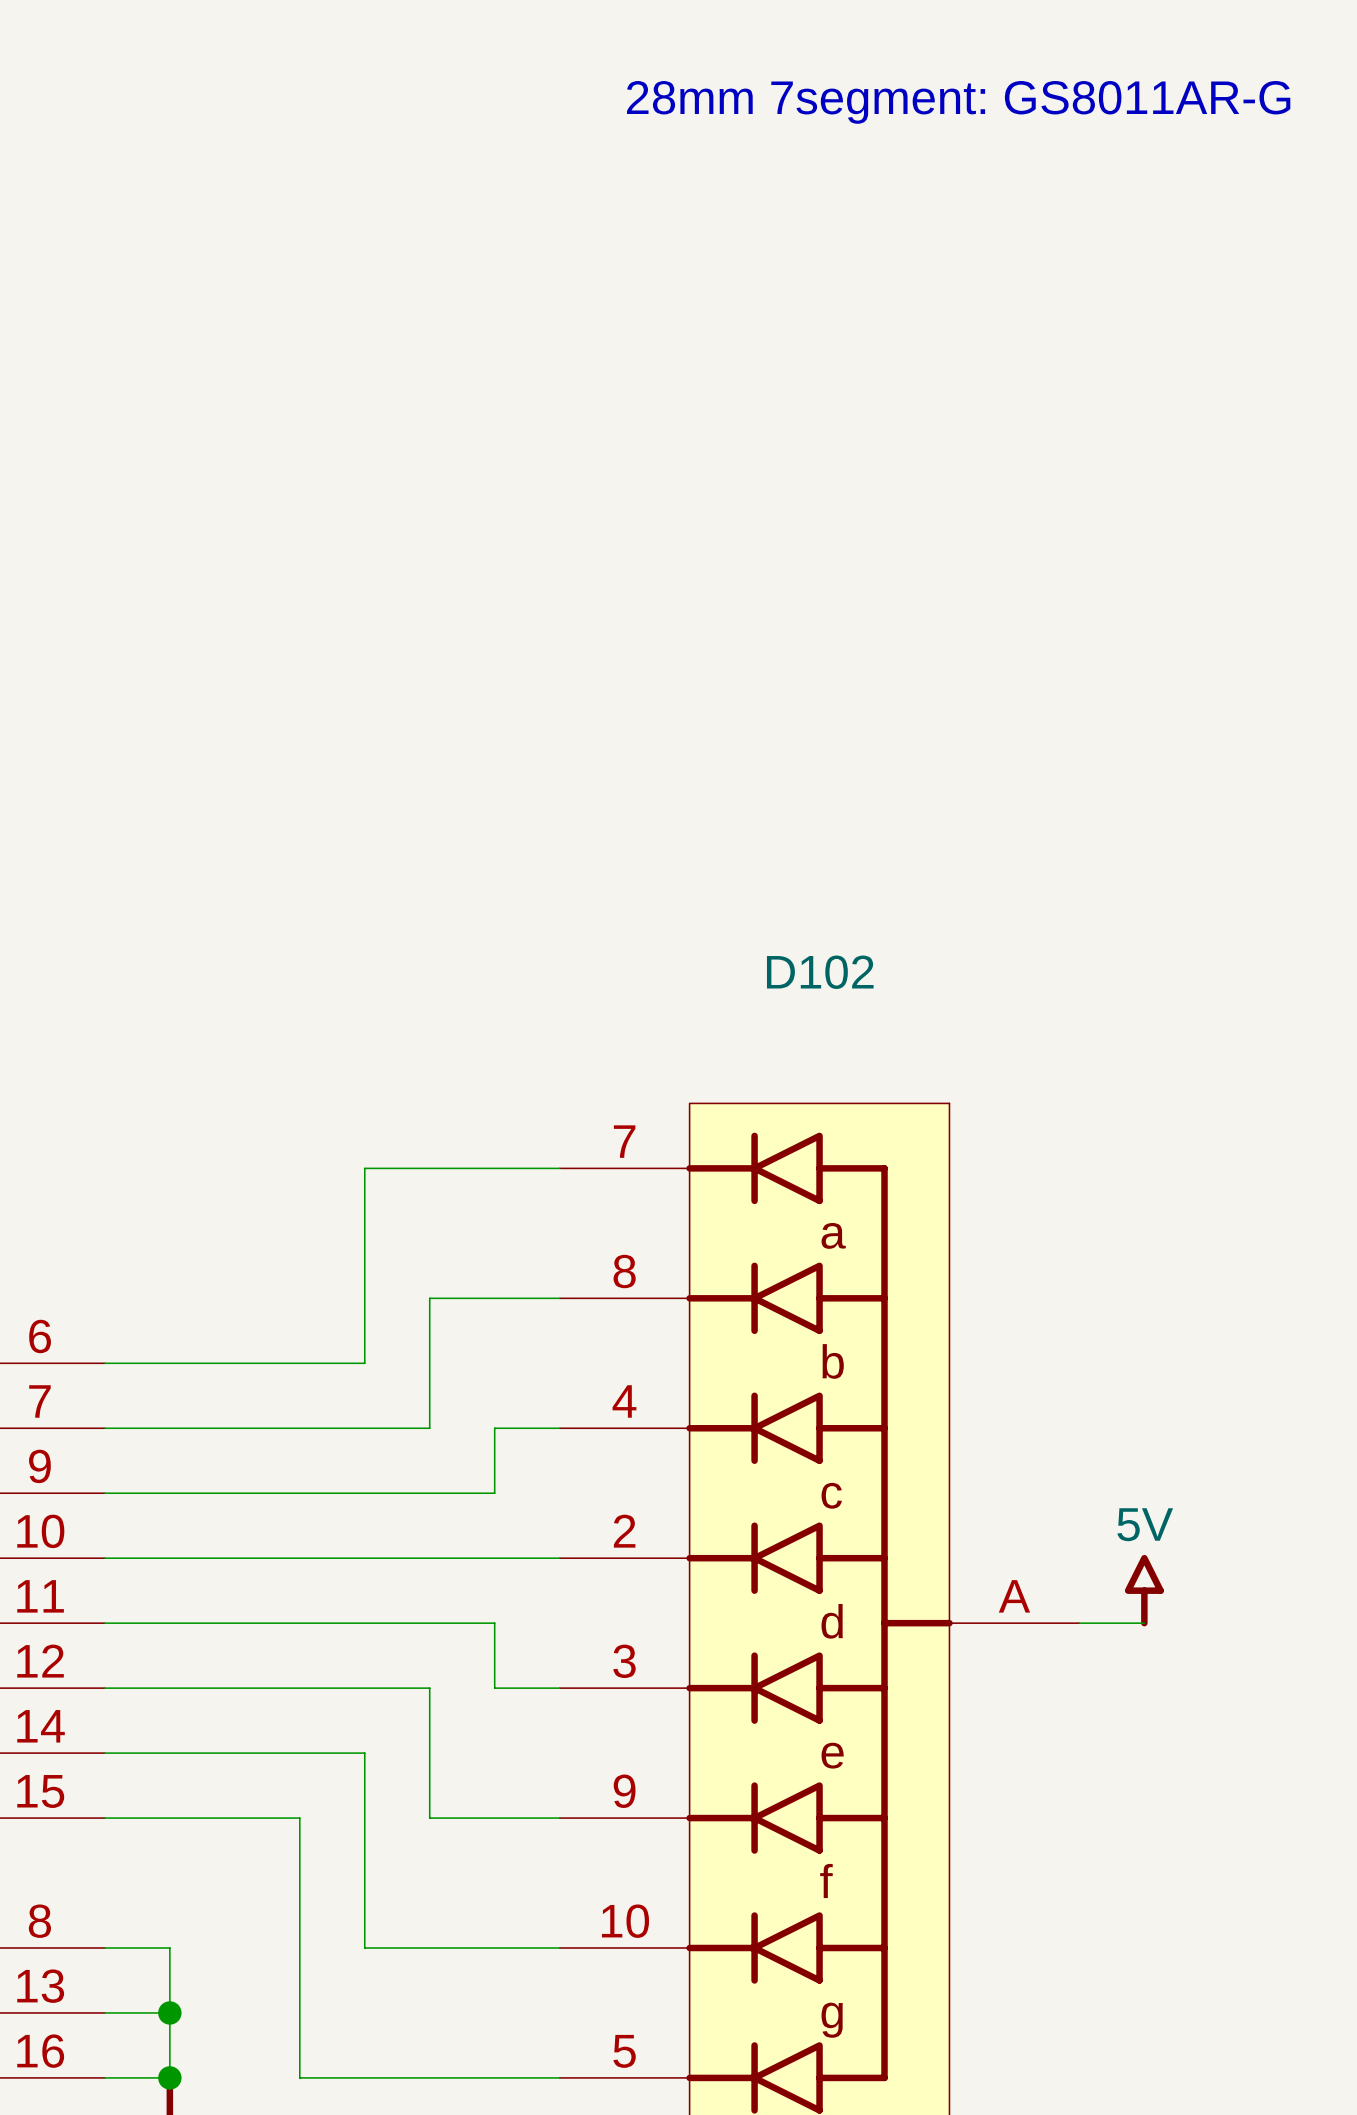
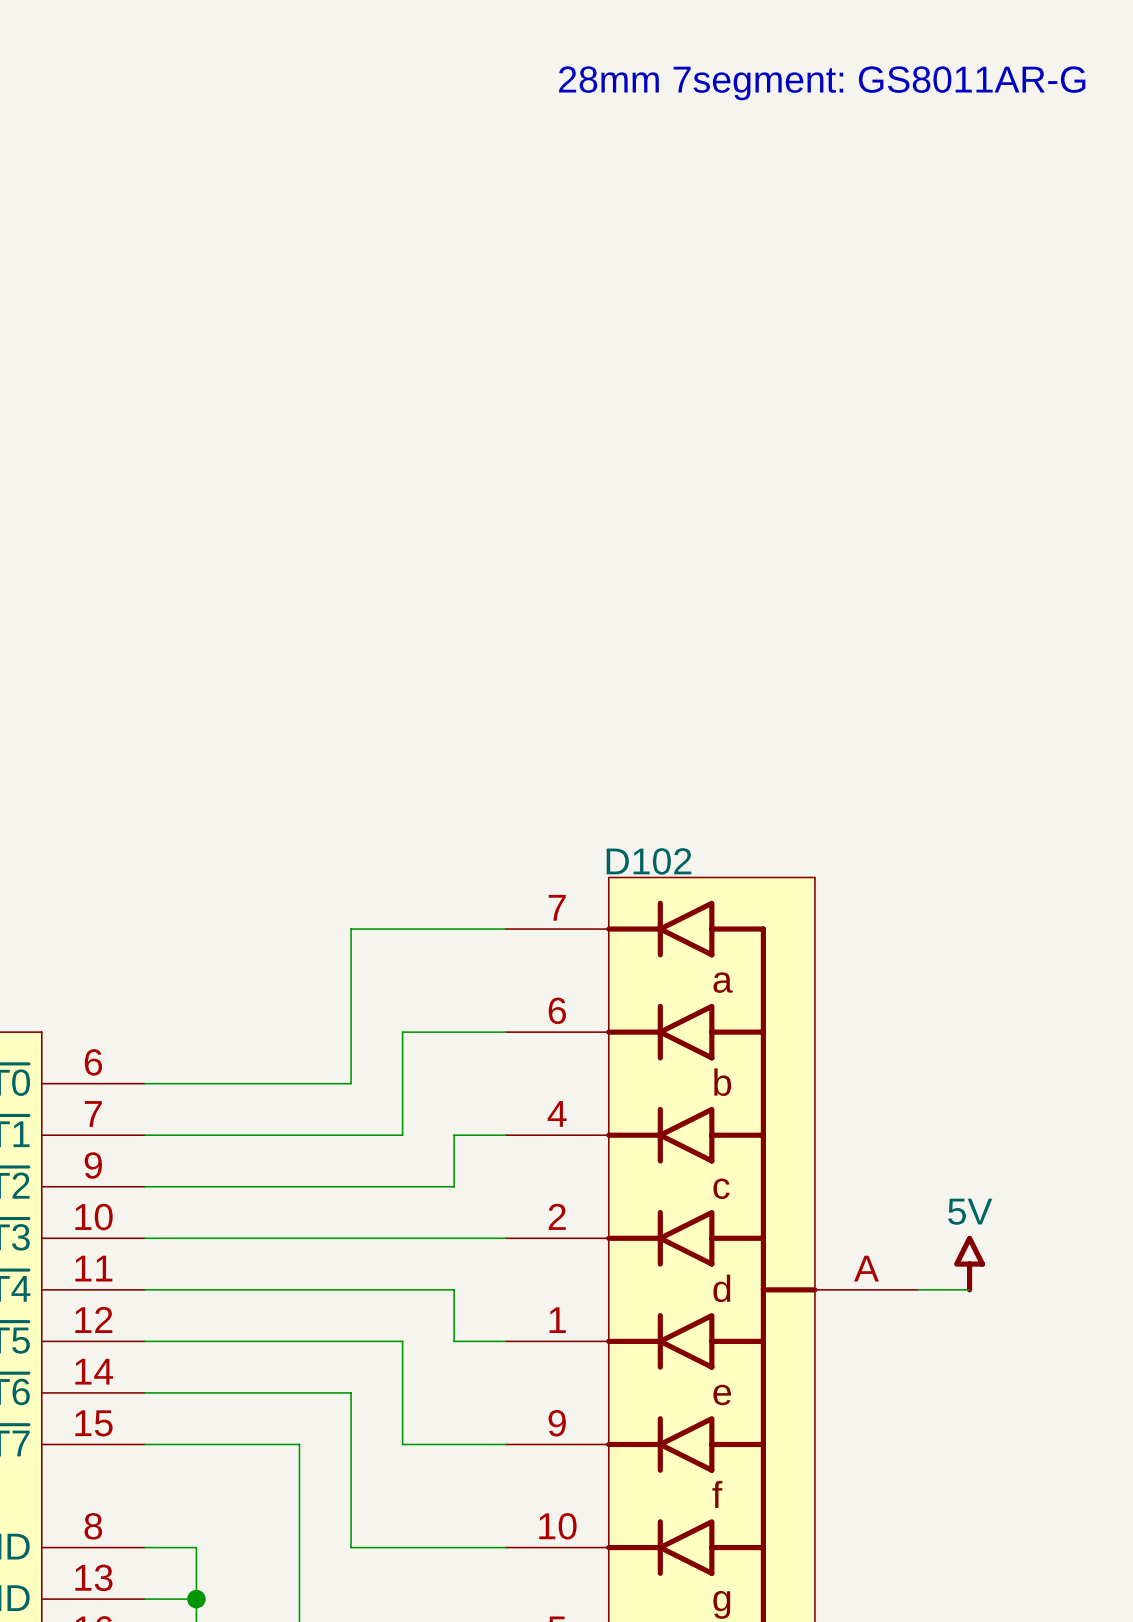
D102 name position: D102 (820, 972) -> D102 (648, 861)
D102 pin number: 8 (624, 1271) -> 6 (557, 1010)
D102 pin number: 3 (624, 1661) -> 1 (557, 1320)

